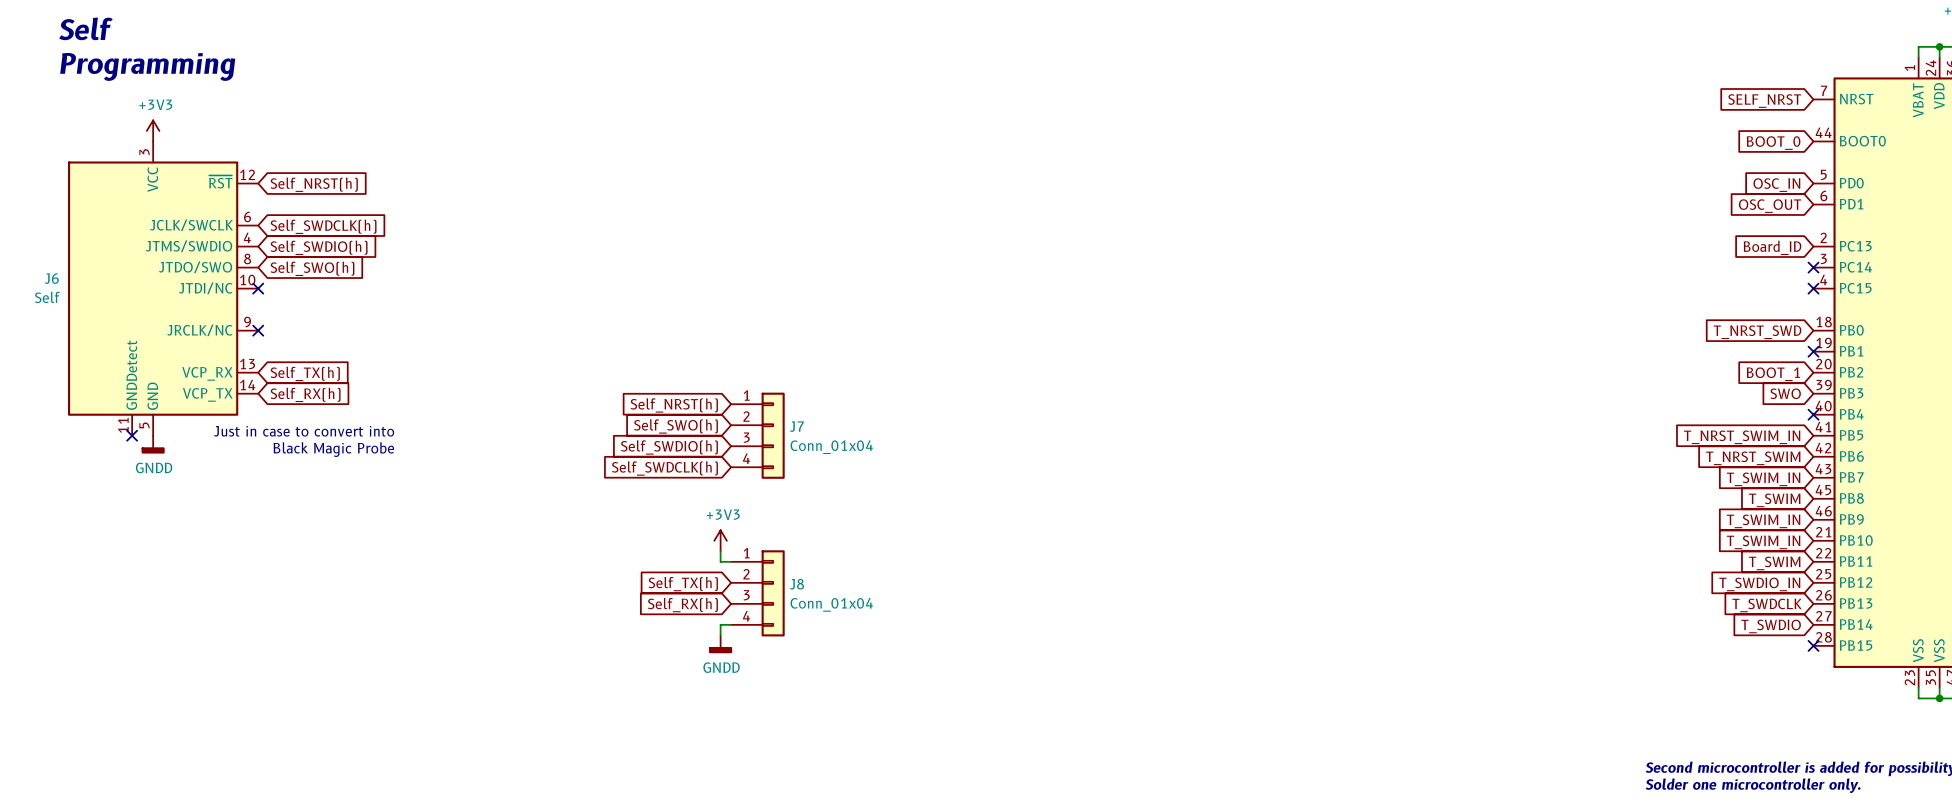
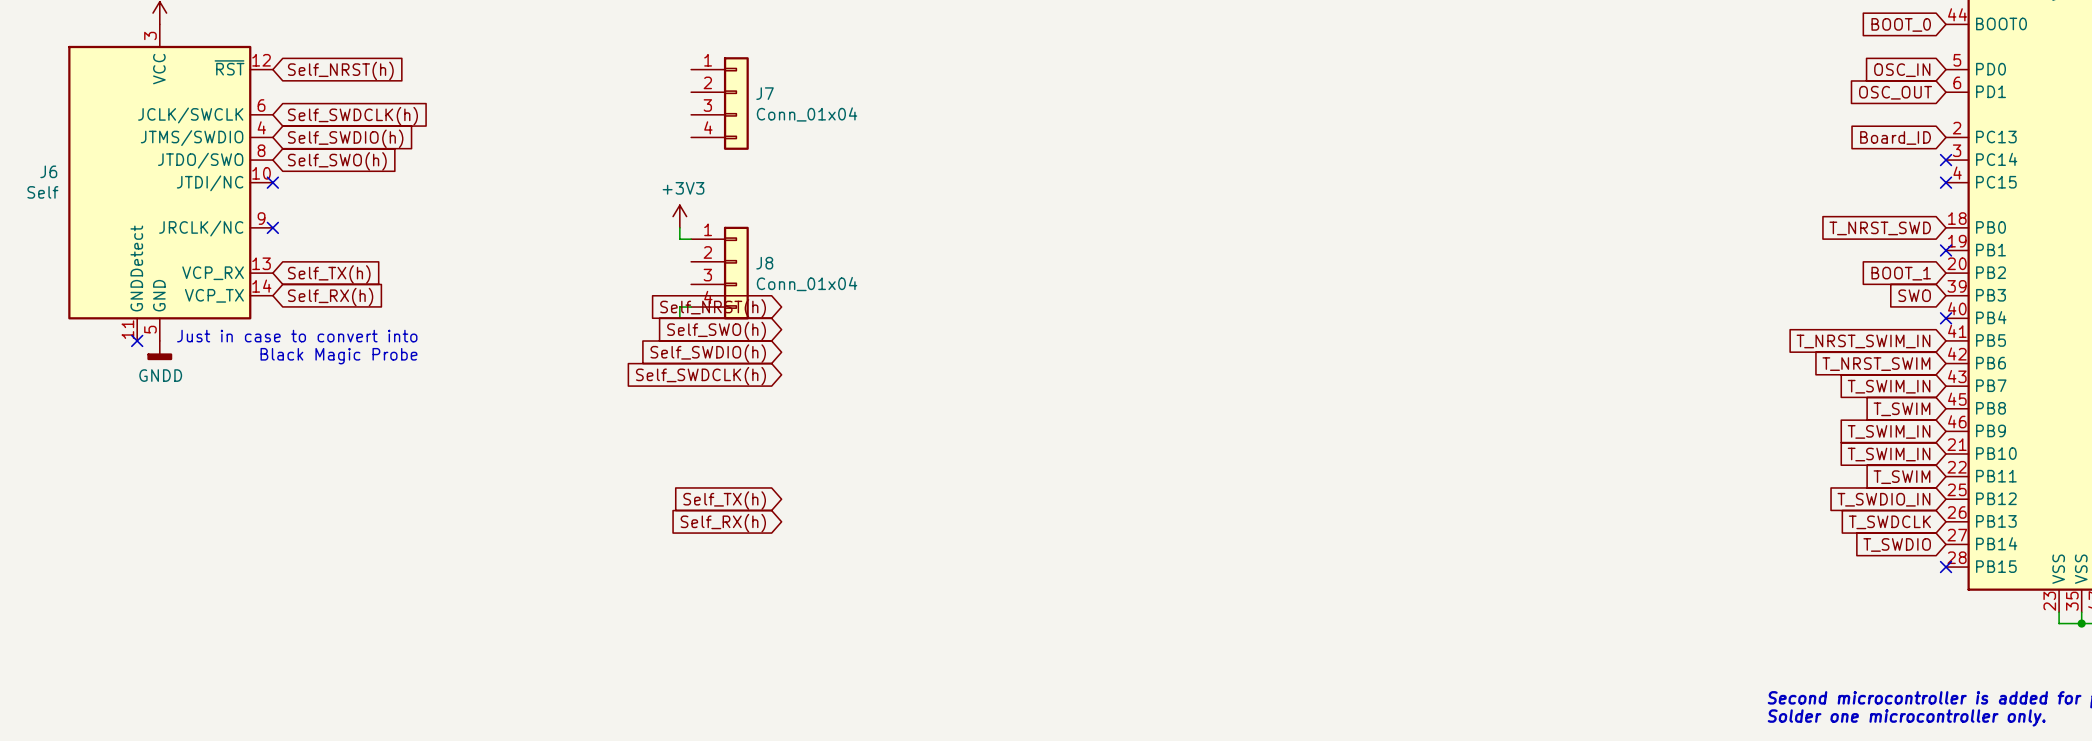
power symbol: none -> +3V3 (679, 216)
wire: none -> (679, 227) (679, 239) (691, 239)
wire: none -> (691, 307) (679, 307) (679, 318)
J7 position: (757, 435) -> (719, 103)
power symbol: +3V3 (720, 540) -> none
wire: (720, 551) (720, 561) (731, 561) -> none
J8 position: (757, 593) -> (719, 273)
wire: (731, 624) (720, 624) (720, 635) -> none
power symbol: GNDD (720, 644) -> none

